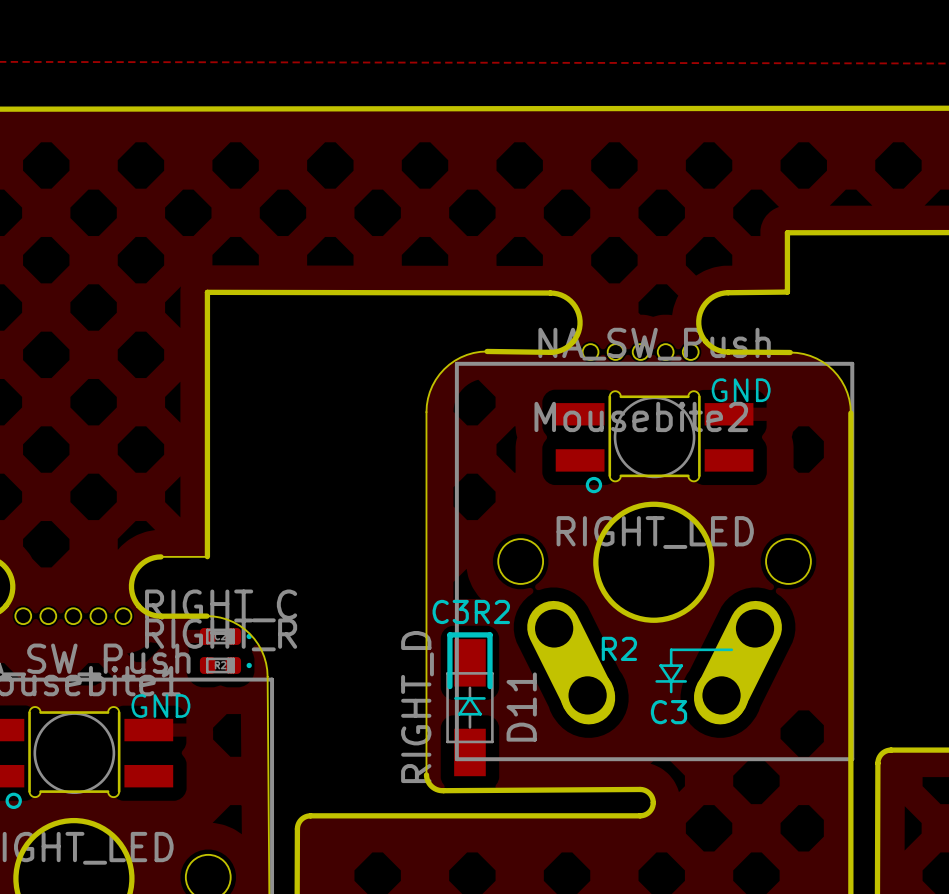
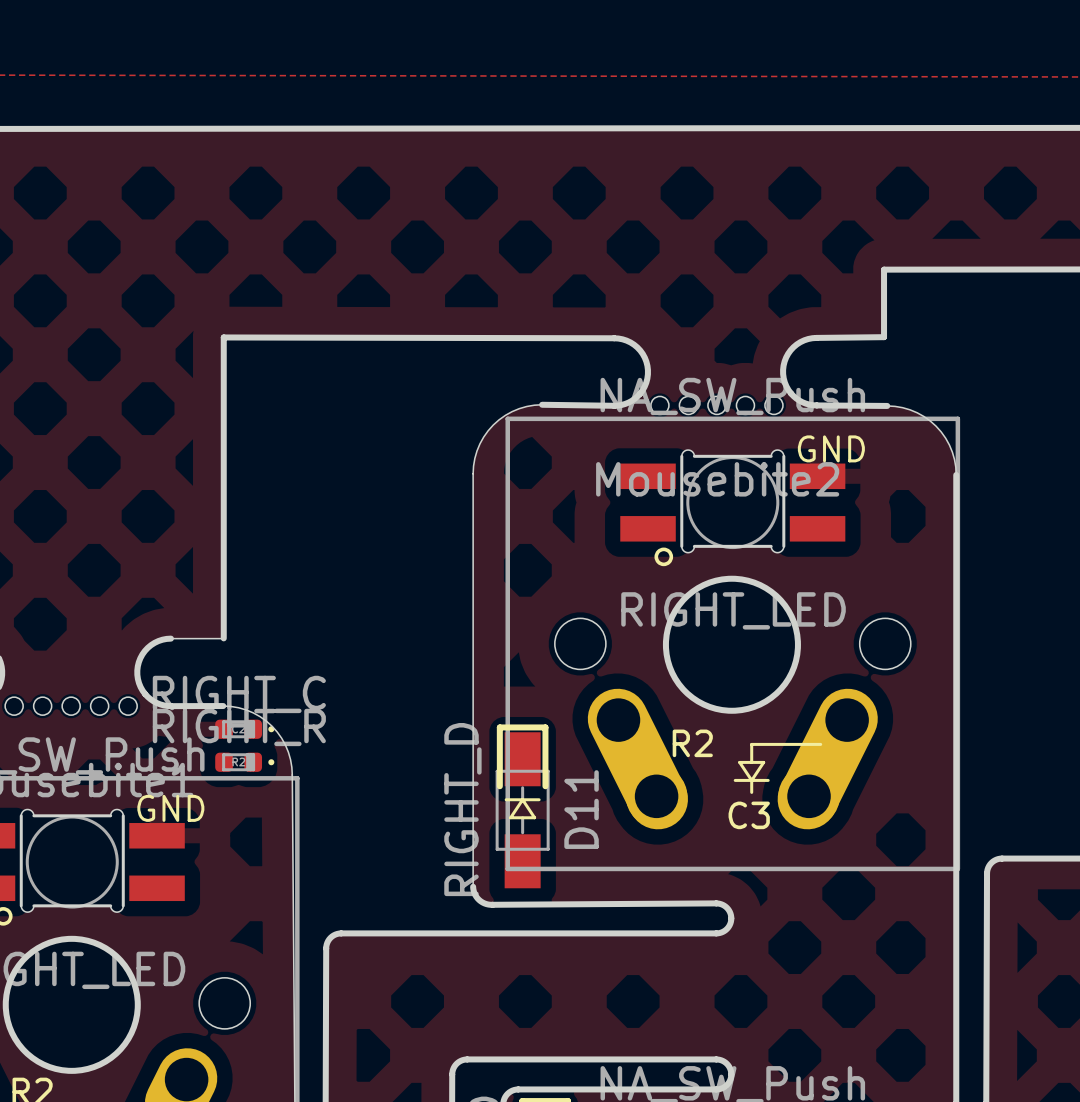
text: C3R2 (471, 611) -> none

